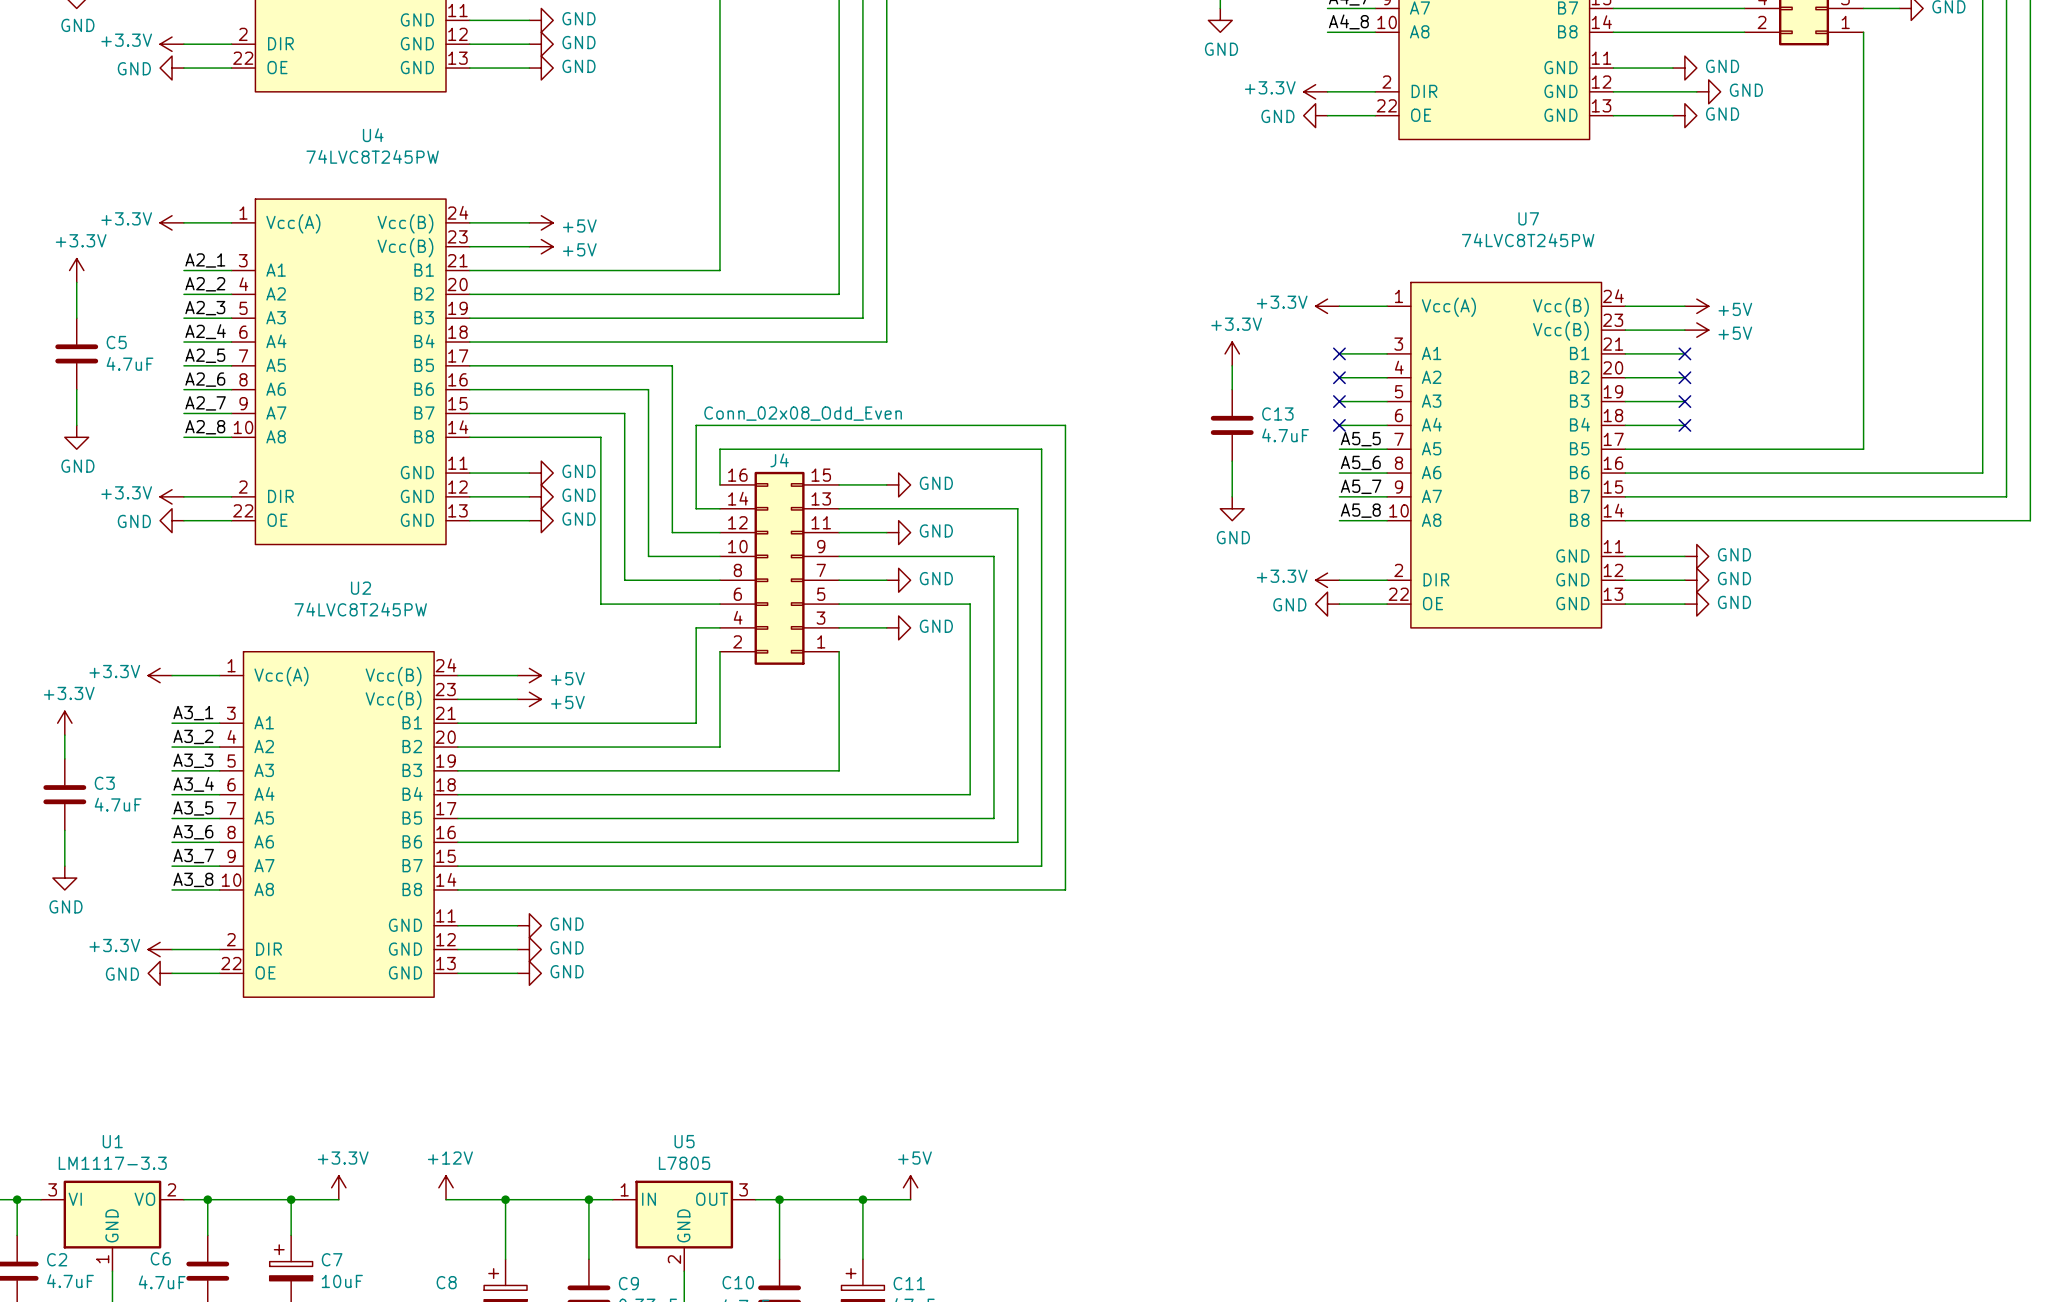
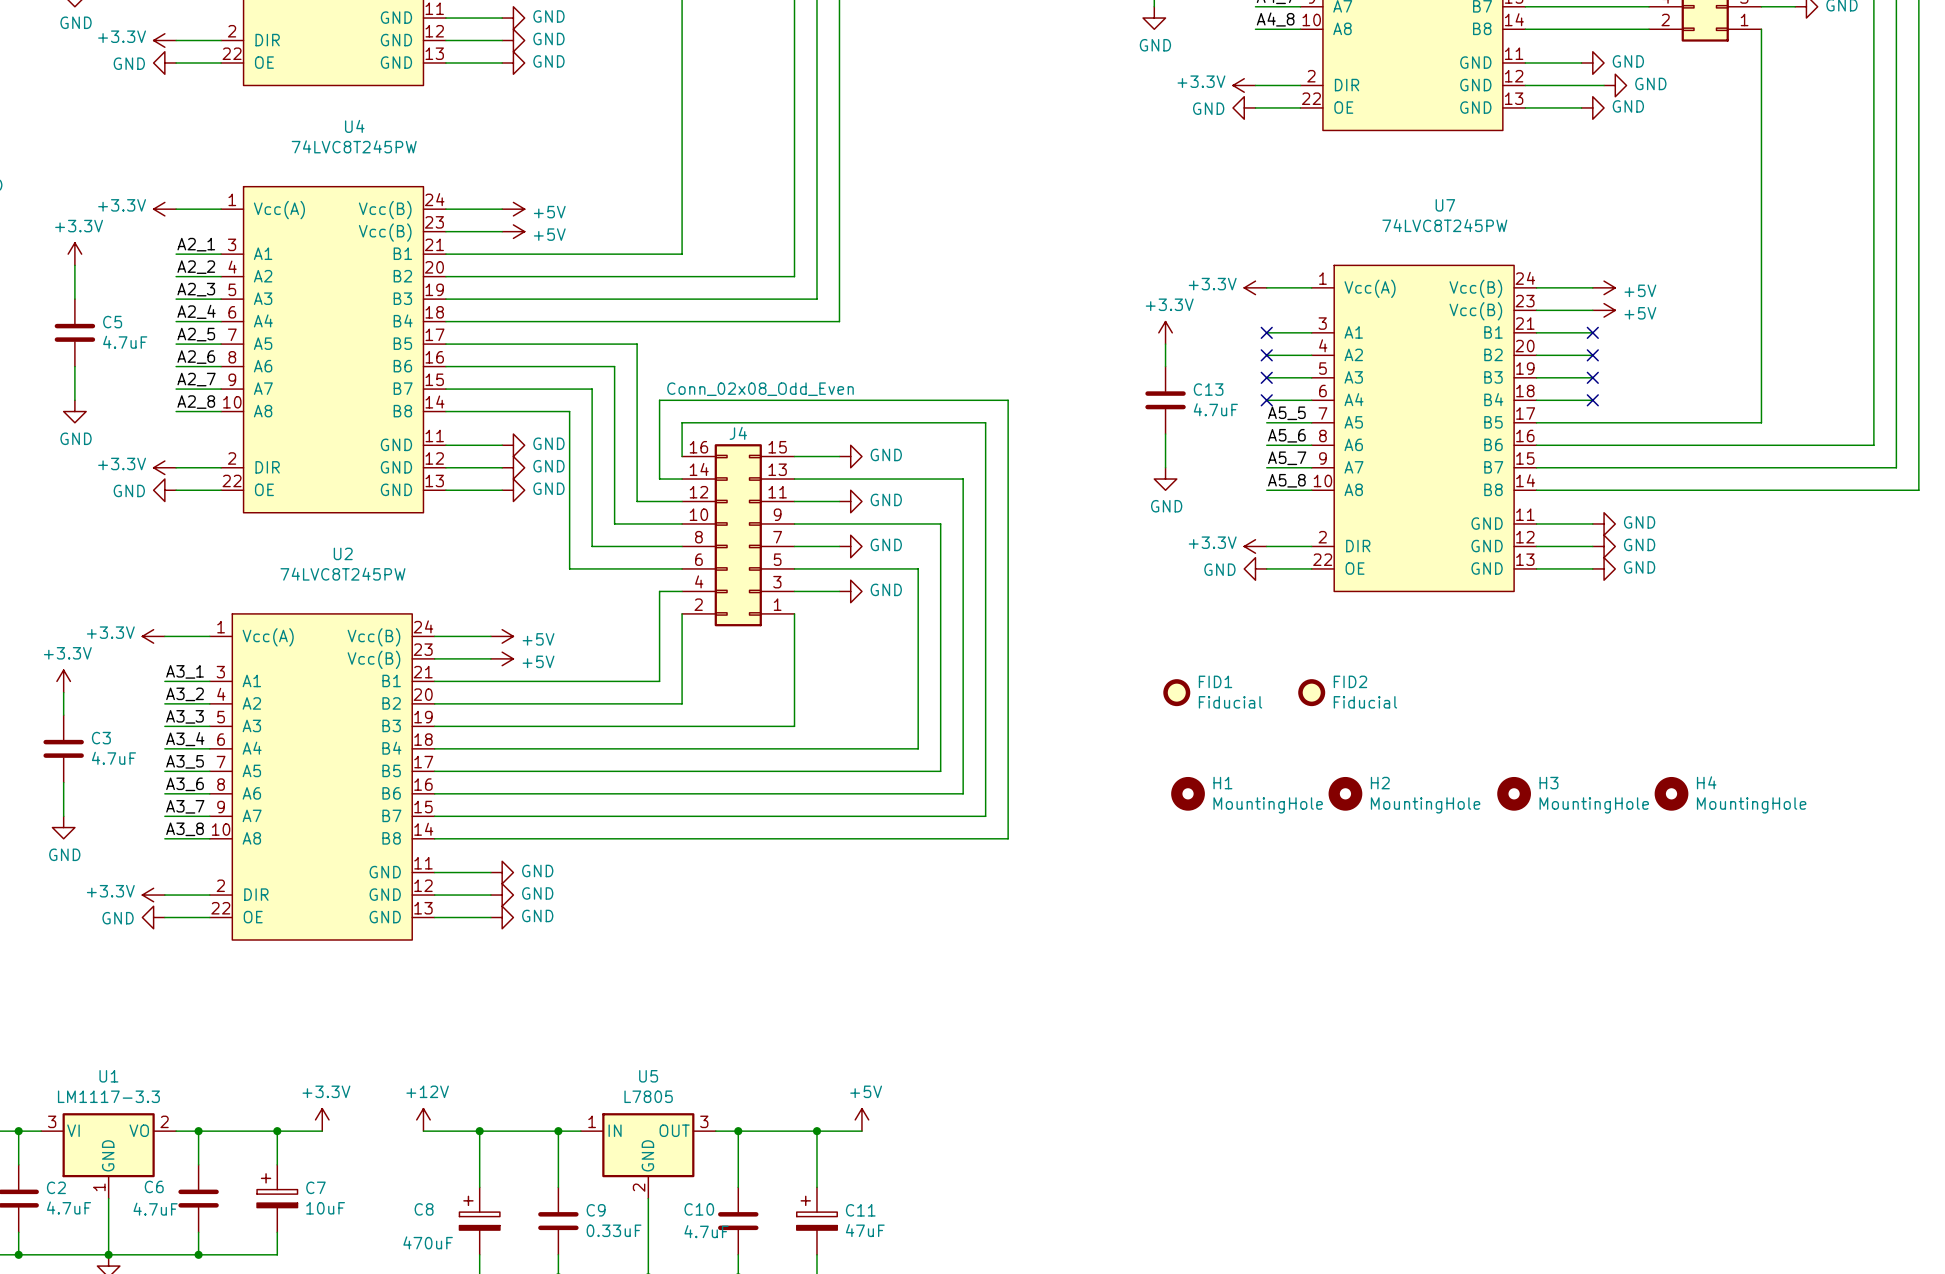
FID1: none -> Fiducial (1176, 692)
FID2: none -> Fiducial (1311, 692)
H1: none -> MountingHole (1188, 793)
H2: none -> MountingHole (1345, 793)
H3: none -> MountingHole (1514, 793)
H4: none -> MountingHole (1671, 793)

